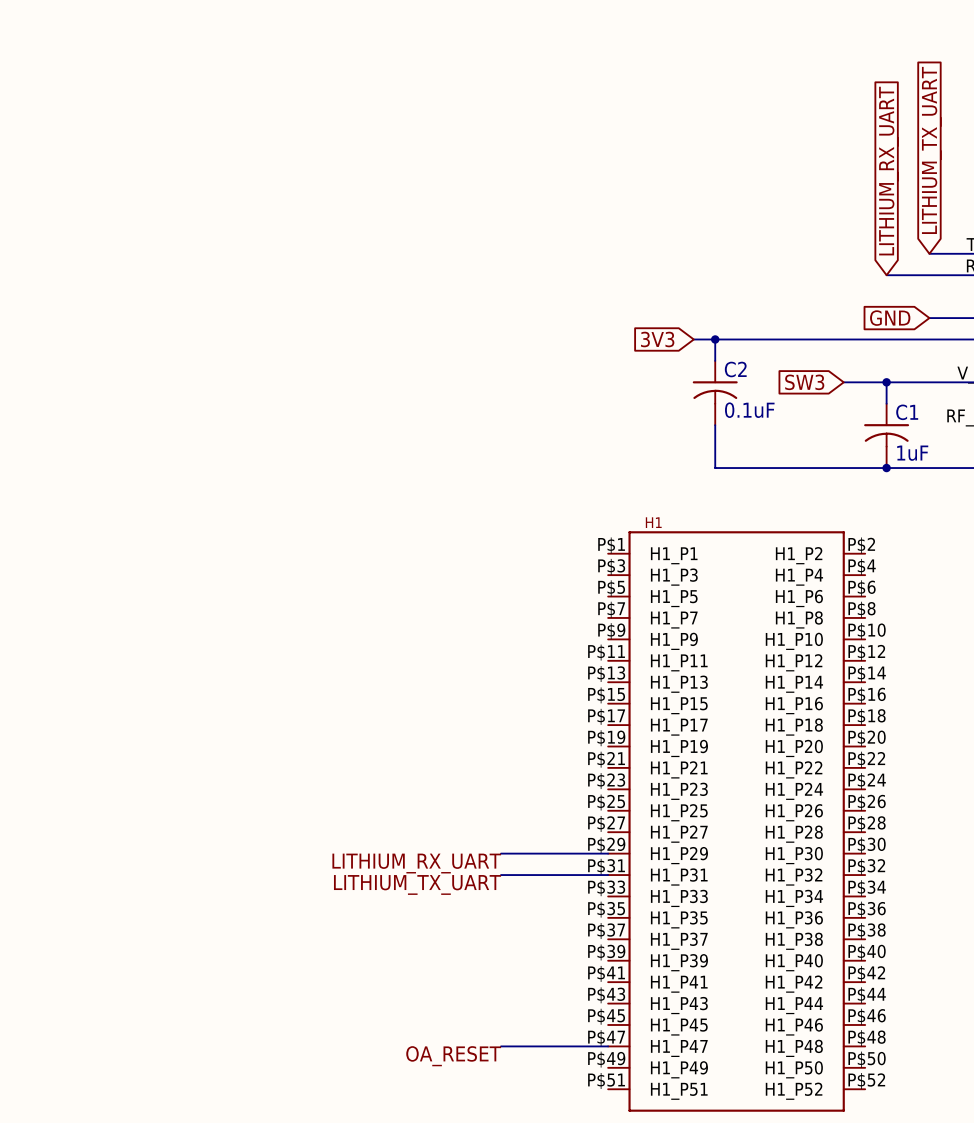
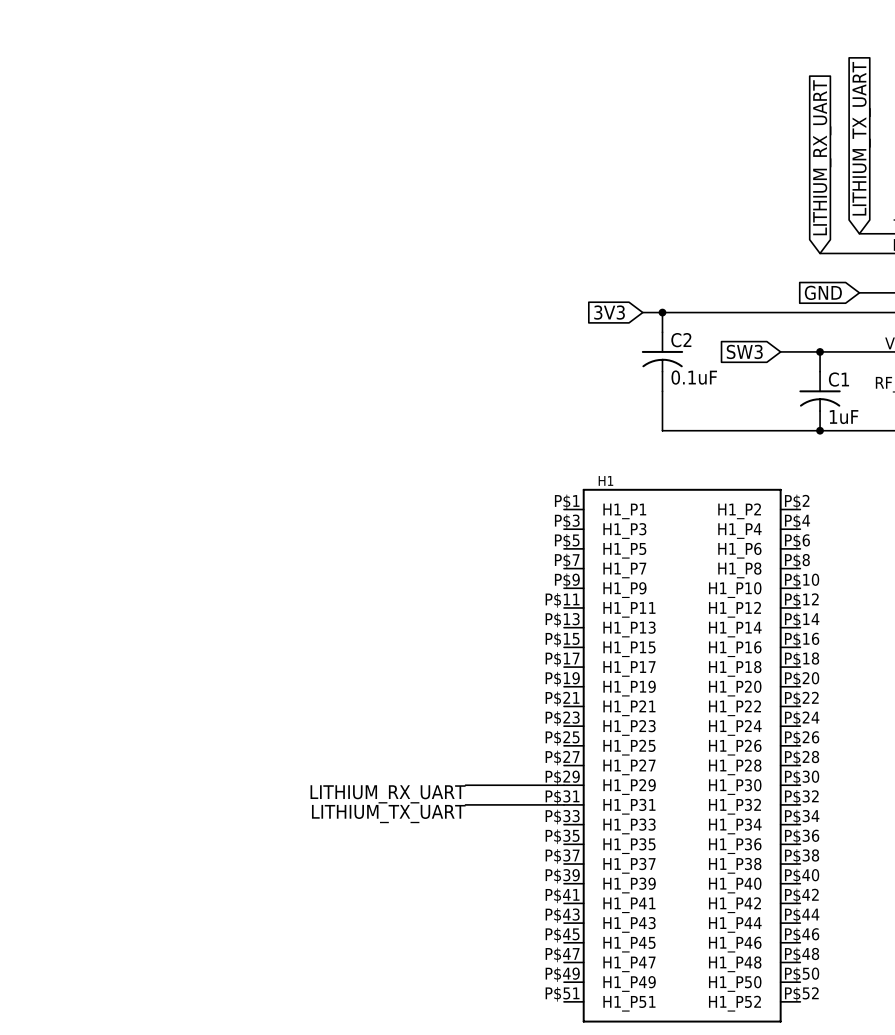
wire: (501, 1046) (608, 1046) -> none
label: OA_RESET (453, 1056) -> none

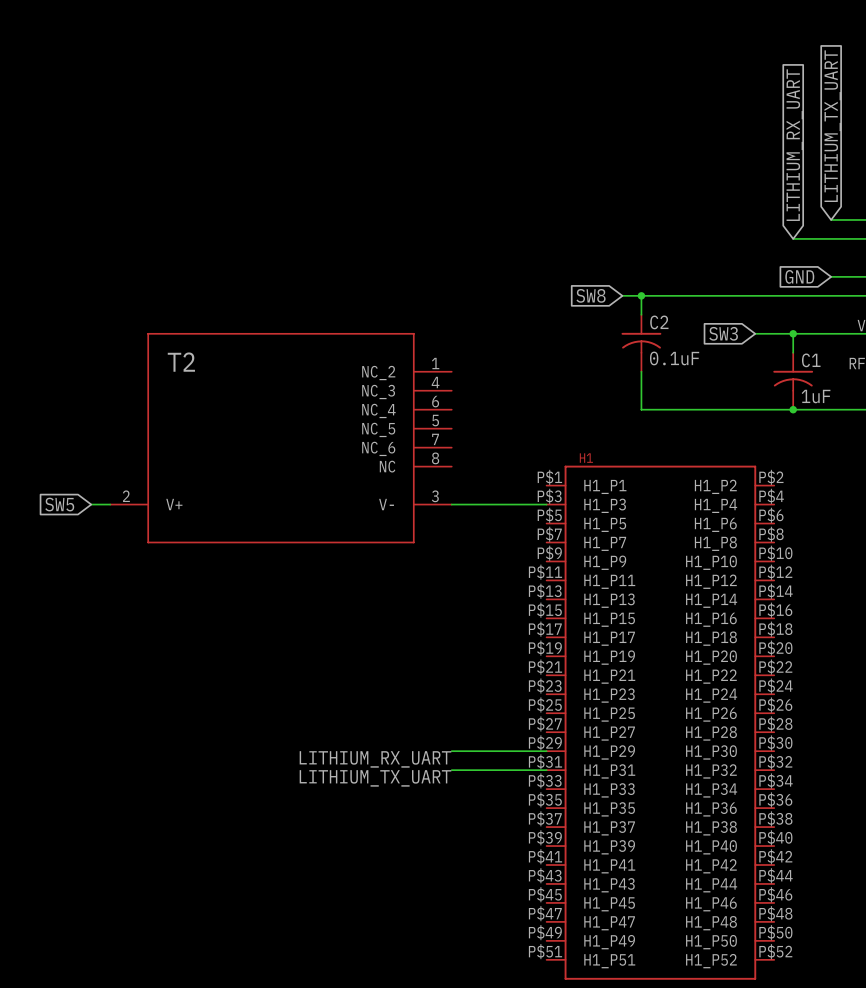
global label: 3V3 (609, 312) -> SW8 (591, 295)
T2: none -> (280, 438)
global label: none -> SW5 (59, 504)
wire: none -> (91, 504) (110, 504)
wire: none -> (451, 504) (546, 504)

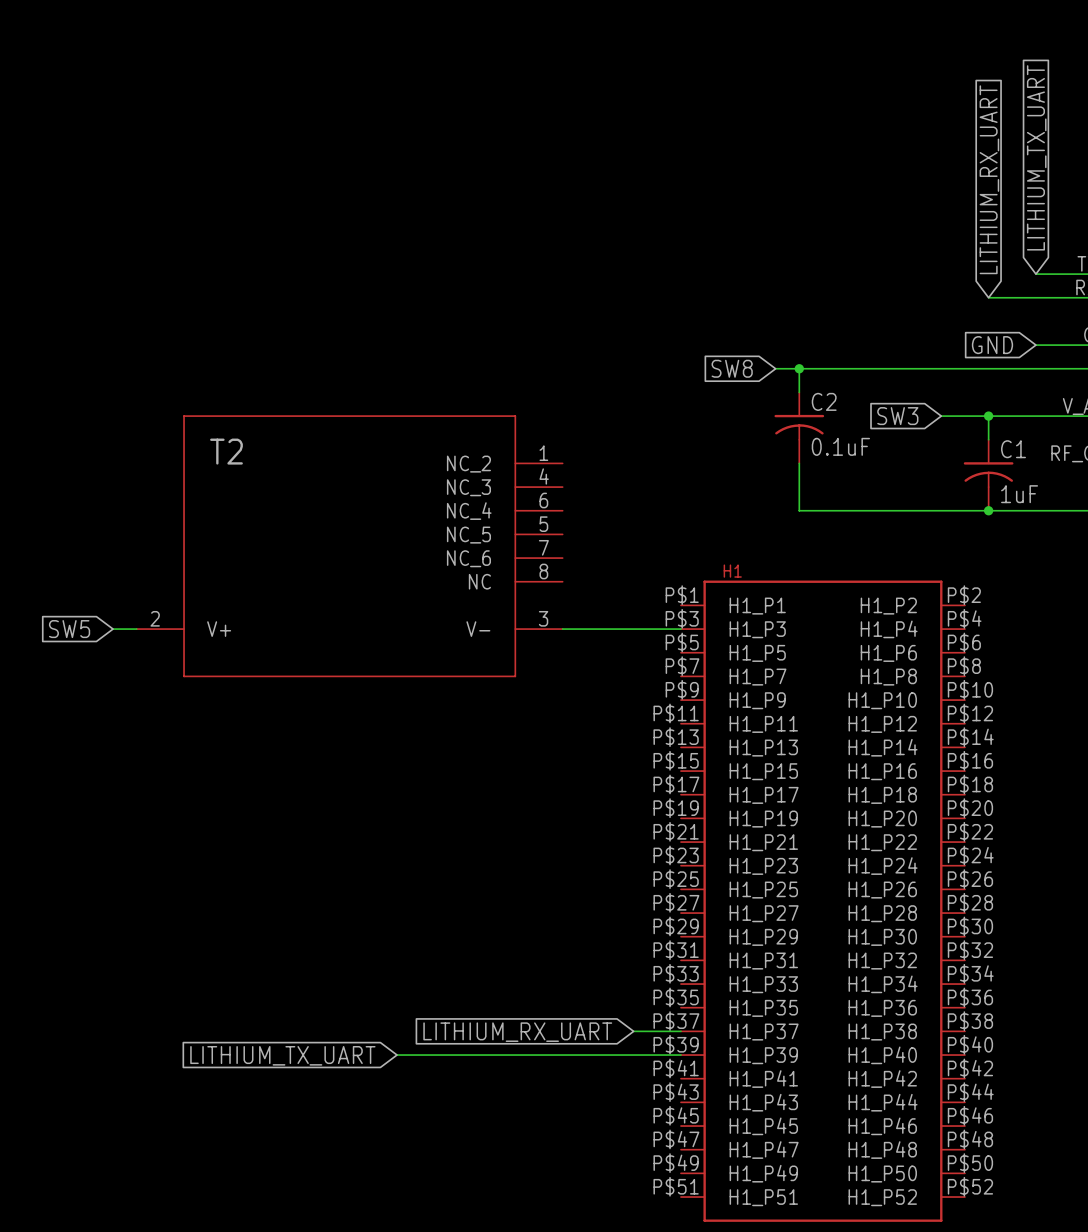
wire: (451, 751) (546, 751) -> none
label: LITHIUM_RX_UART (375, 759) -> none
wire: (451, 770) (546, 770) -> none
label: LITHIUM_TX_UART (375, 778) -> none
wire: none -> (633, 1031) (680, 1031)
global label: none -> LITHIUM_RX_UART (517, 1032)
wire: none -> (397, 1055) (680, 1055)
global label: none -> LITHIUM_TX_UART (282, 1055)

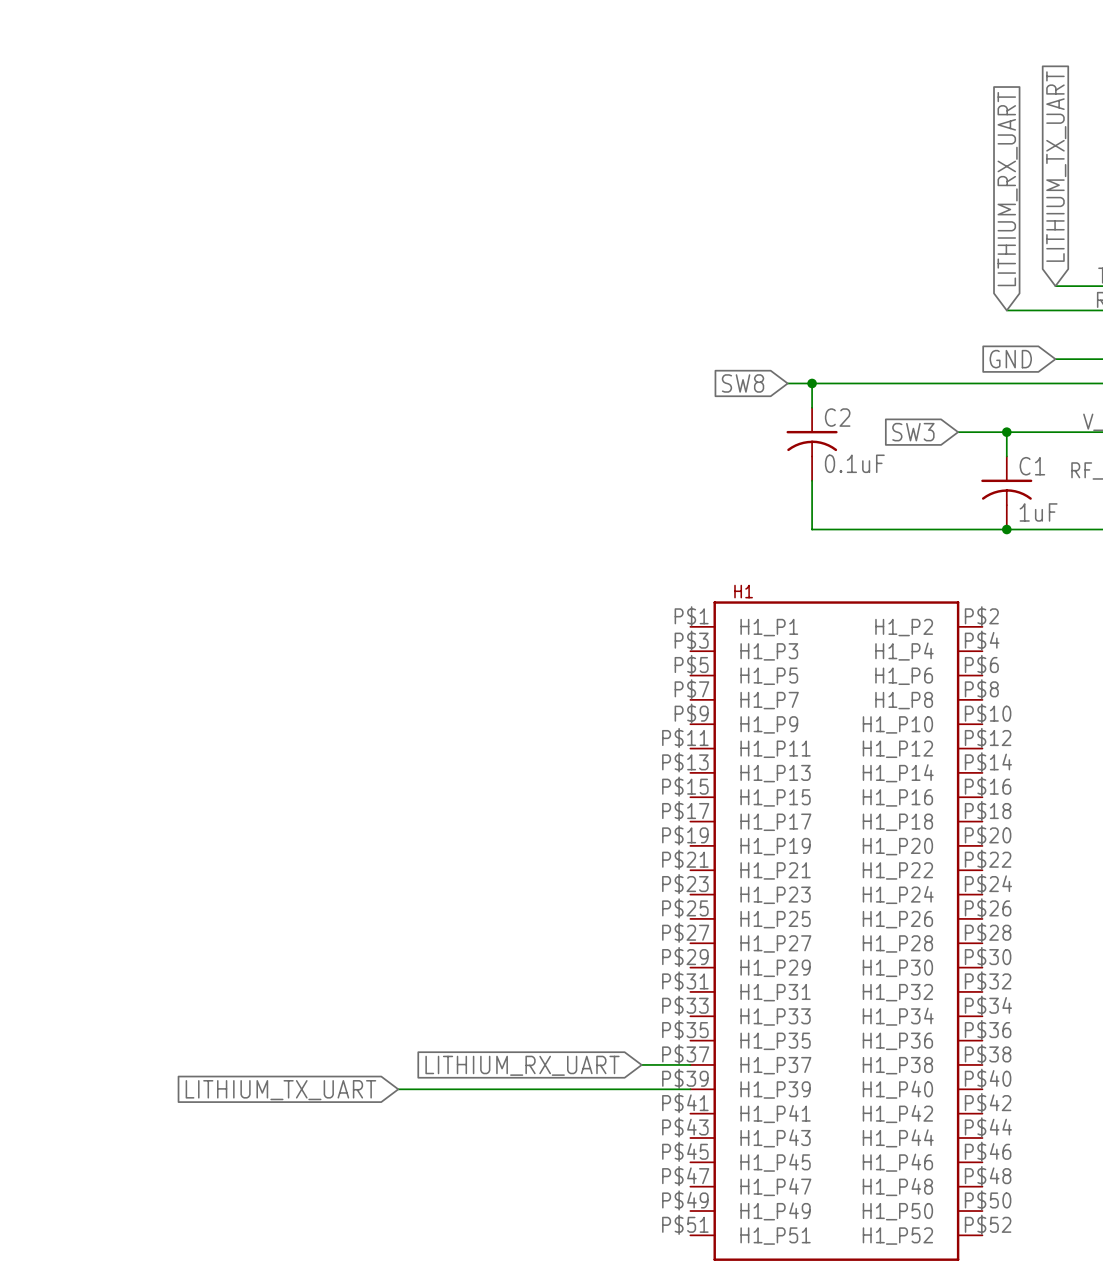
T2: (349, 546) -> none
global label: SW5 (69, 629) -> none
wire: (113, 629) (136, 629) -> none
wire: (562, 629) (680, 629) -> none

